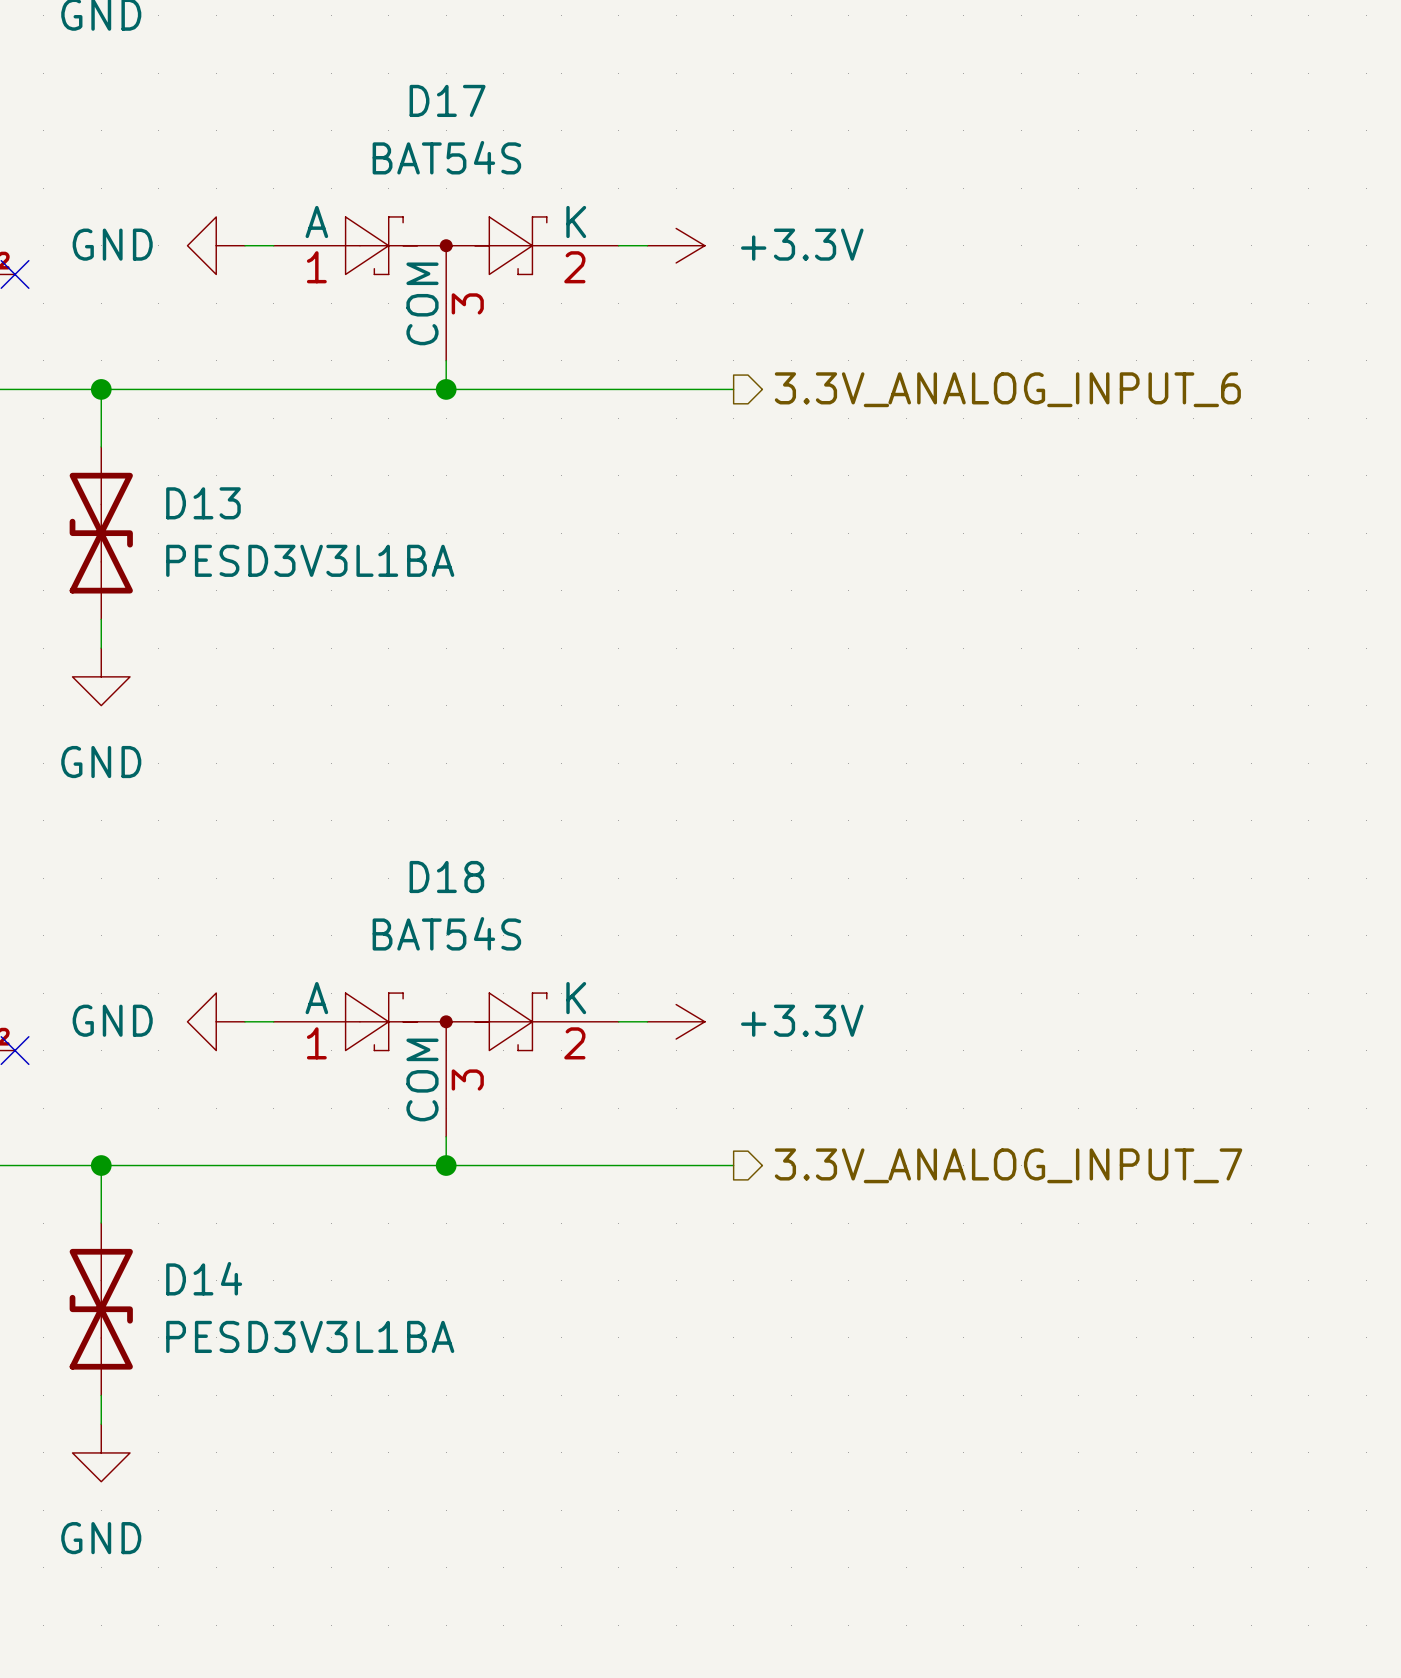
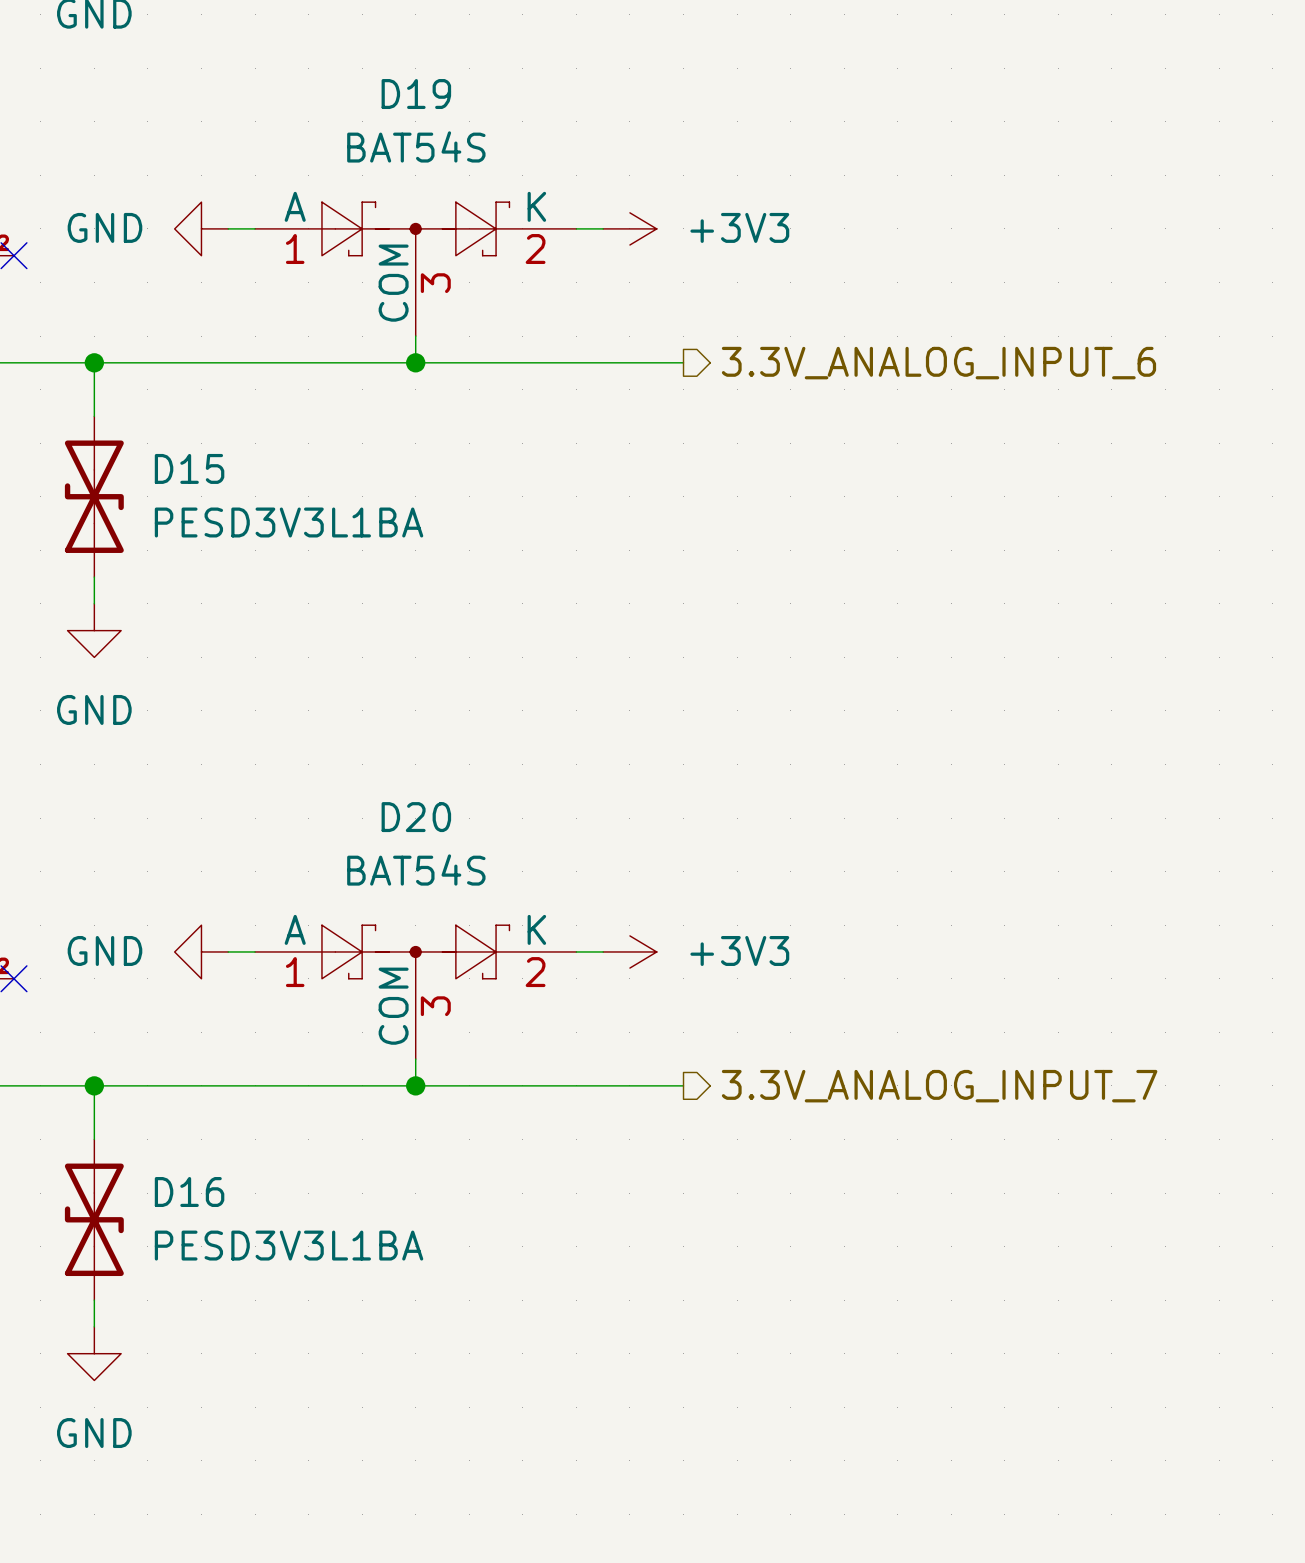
D17 name: D17 (447, 100) -> D19 (416, 94)
power symbol: +3.3V (676, 245) -> +3V3 (629, 228)
D13 name: D13 (203, 503) -> D15 (189, 468)
D18 name: D18 (446, 877) -> D20 (416, 817)
power symbol: +3.3V (676, 1021) -> +3V3 (629, 951)
D14 name: D14 (204, 1278) -> D16 (189, 1192)

